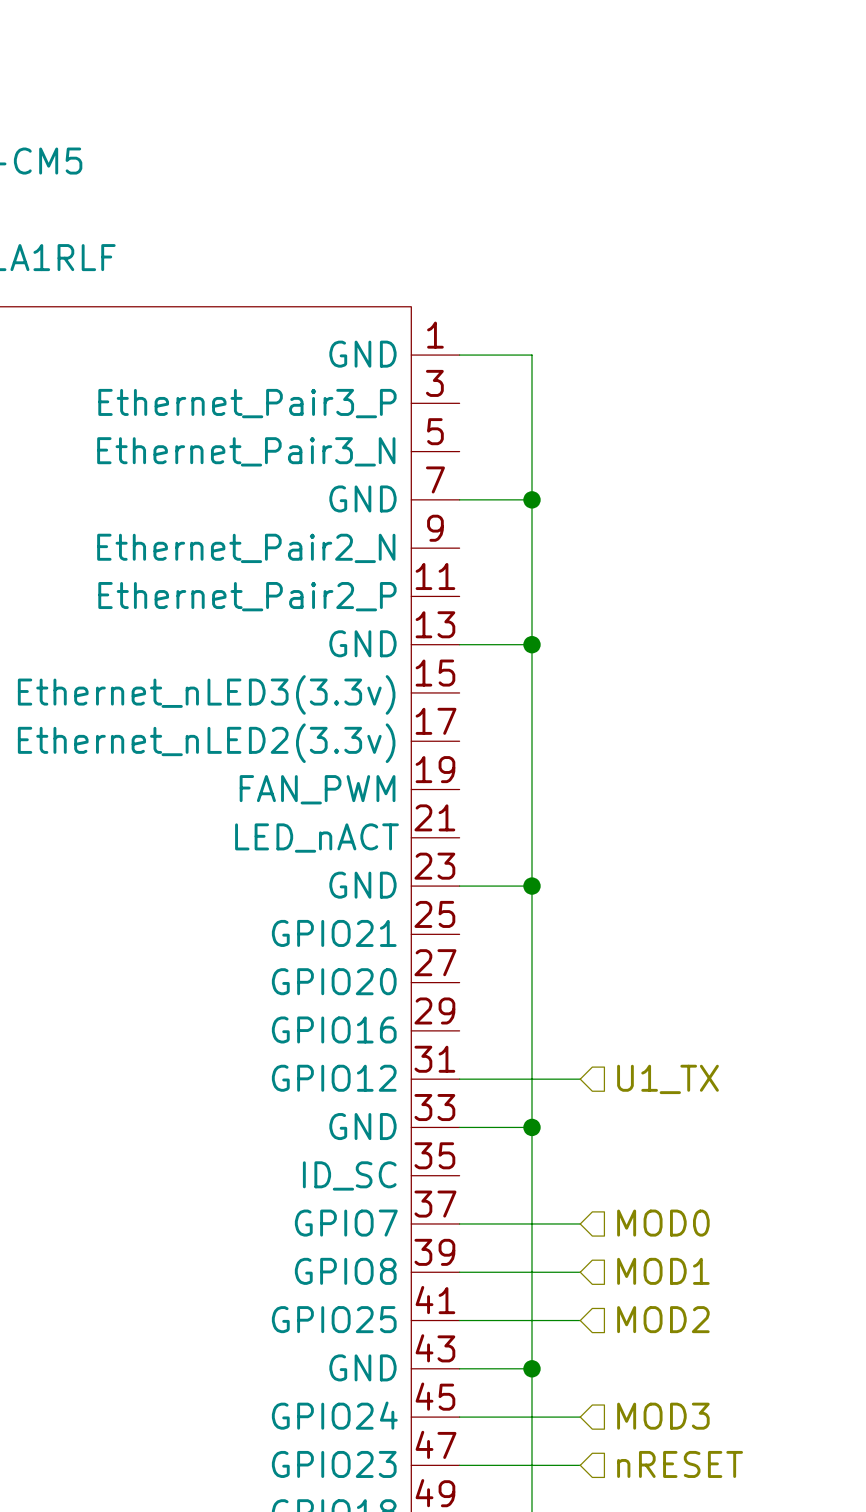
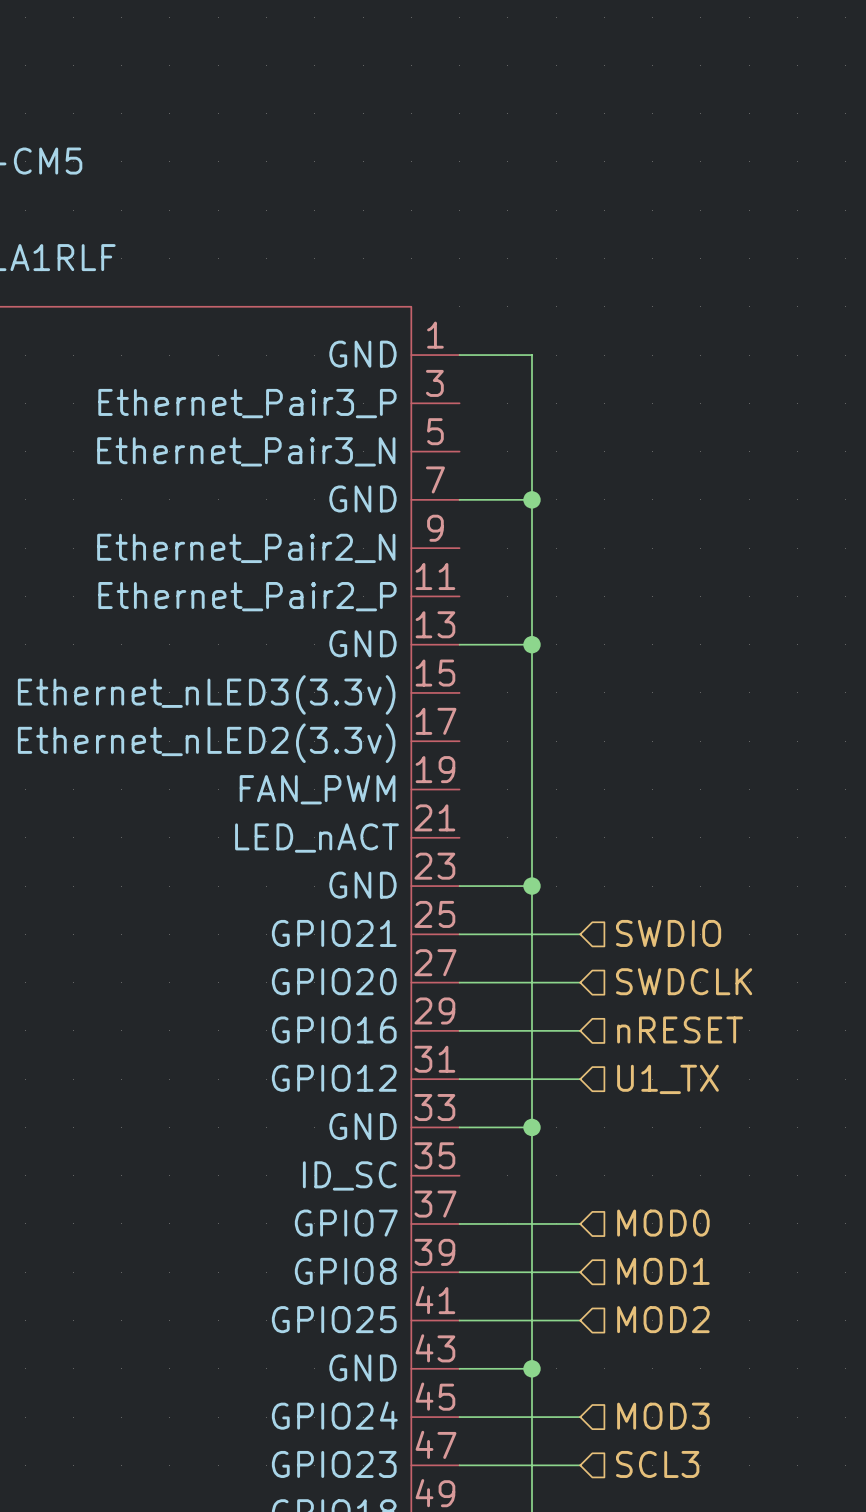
hierarchical label: none -> SWDIO (668, 933)
wire: none -> (459, 934) (580, 934)
hierarchical label: none -> SWDCLK (684, 981)
wire: none -> (459, 982) (580, 982)
hierarchical label: none -> nRESET (680, 1029)
wire: none -> (459, 1030) (580, 1030)
hierarchical label: nRESET (680, 1464) -> SCL3 (657, 1464)

